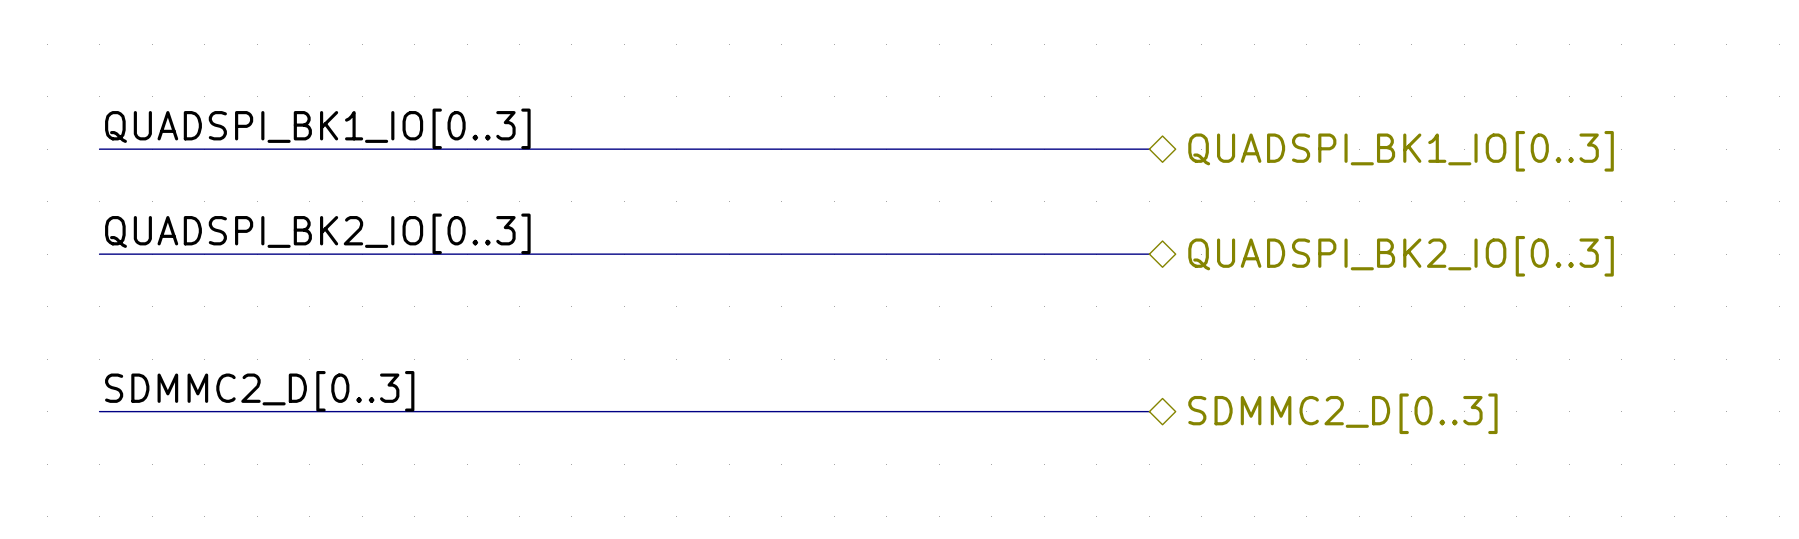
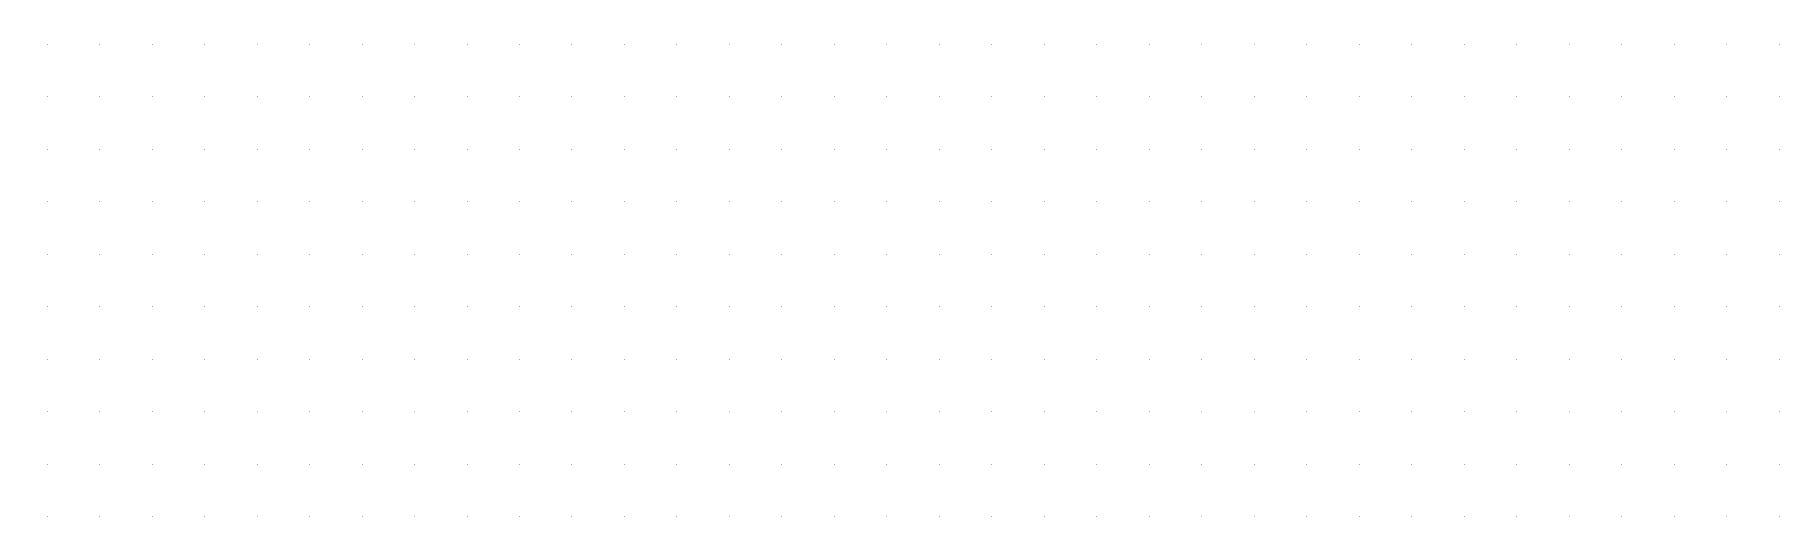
label: QUADSPI_BK1_IO[0..3] (317, 128) -> none
bus: (99, 149) (1149, 149) -> none
hierarchical label: QUADSPI_BK1_IO[0..3] (1401, 151) -> none
label: QUADSPI_BK2_IO[0..3] (317, 233) -> none
bus: (99, 254) (1149, 254) -> none
hierarchical label: QUADSPI_BK2_IO[0..3] (1401, 256) -> none
label: SDMMC2_D[0..3] (259, 391) -> none
bus: (99, 411) (1149, 411) -> none
hierarchical label: SDMMC2_D[0..3] (1342, 413) -> none

